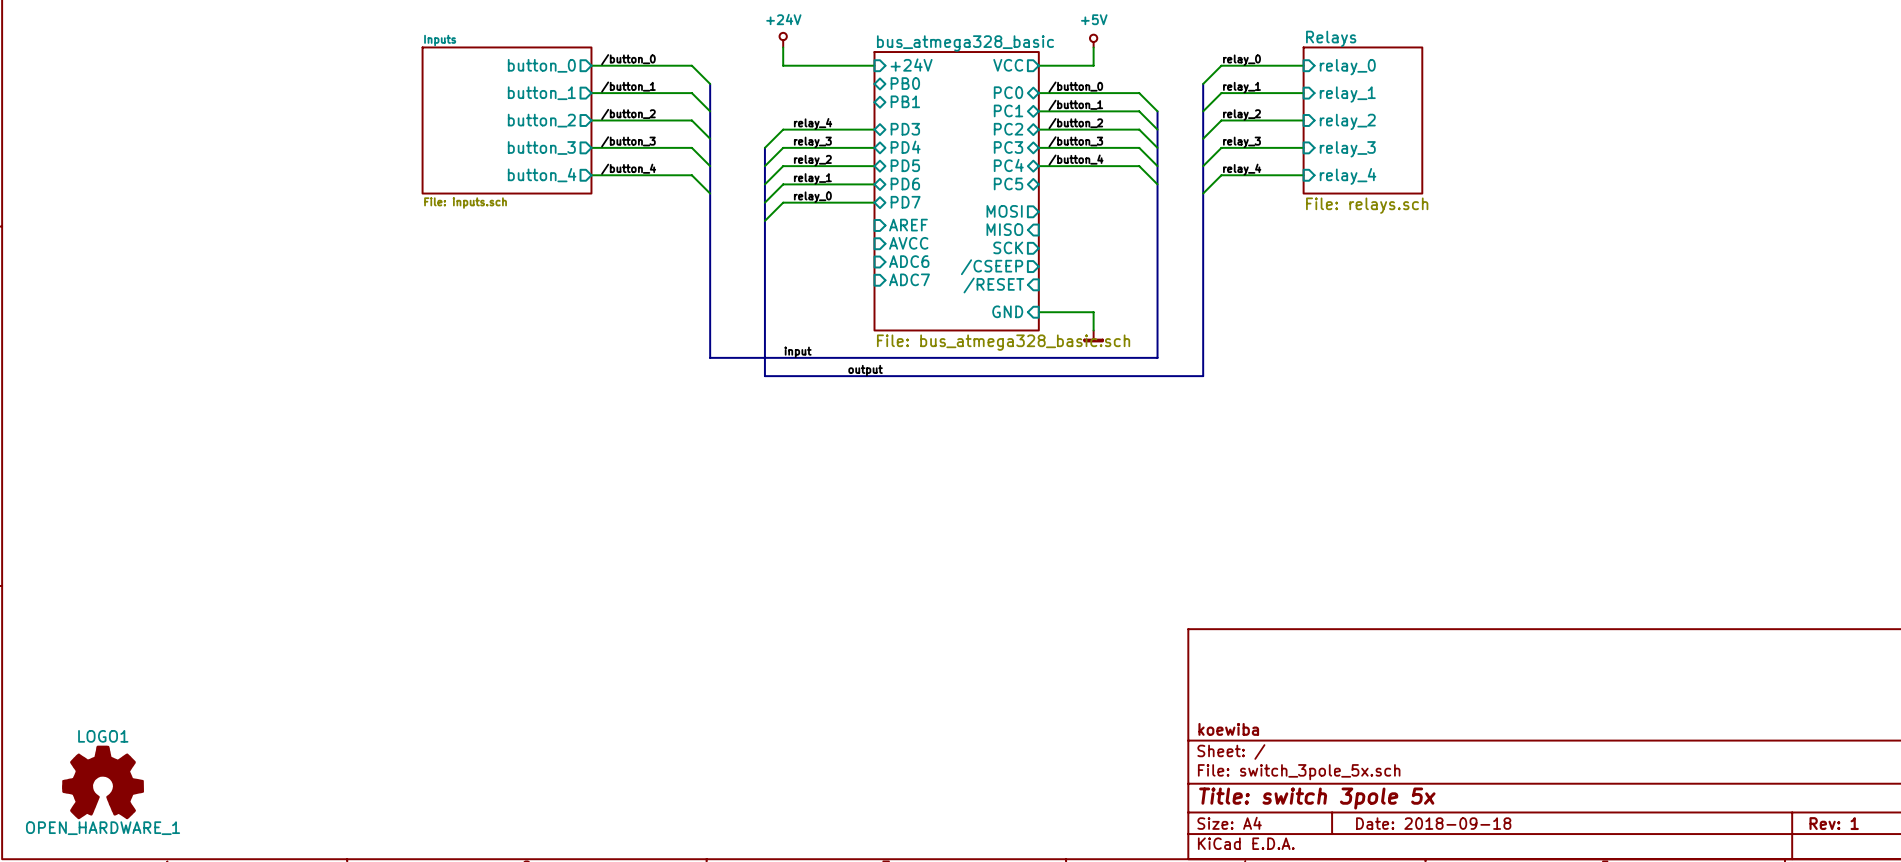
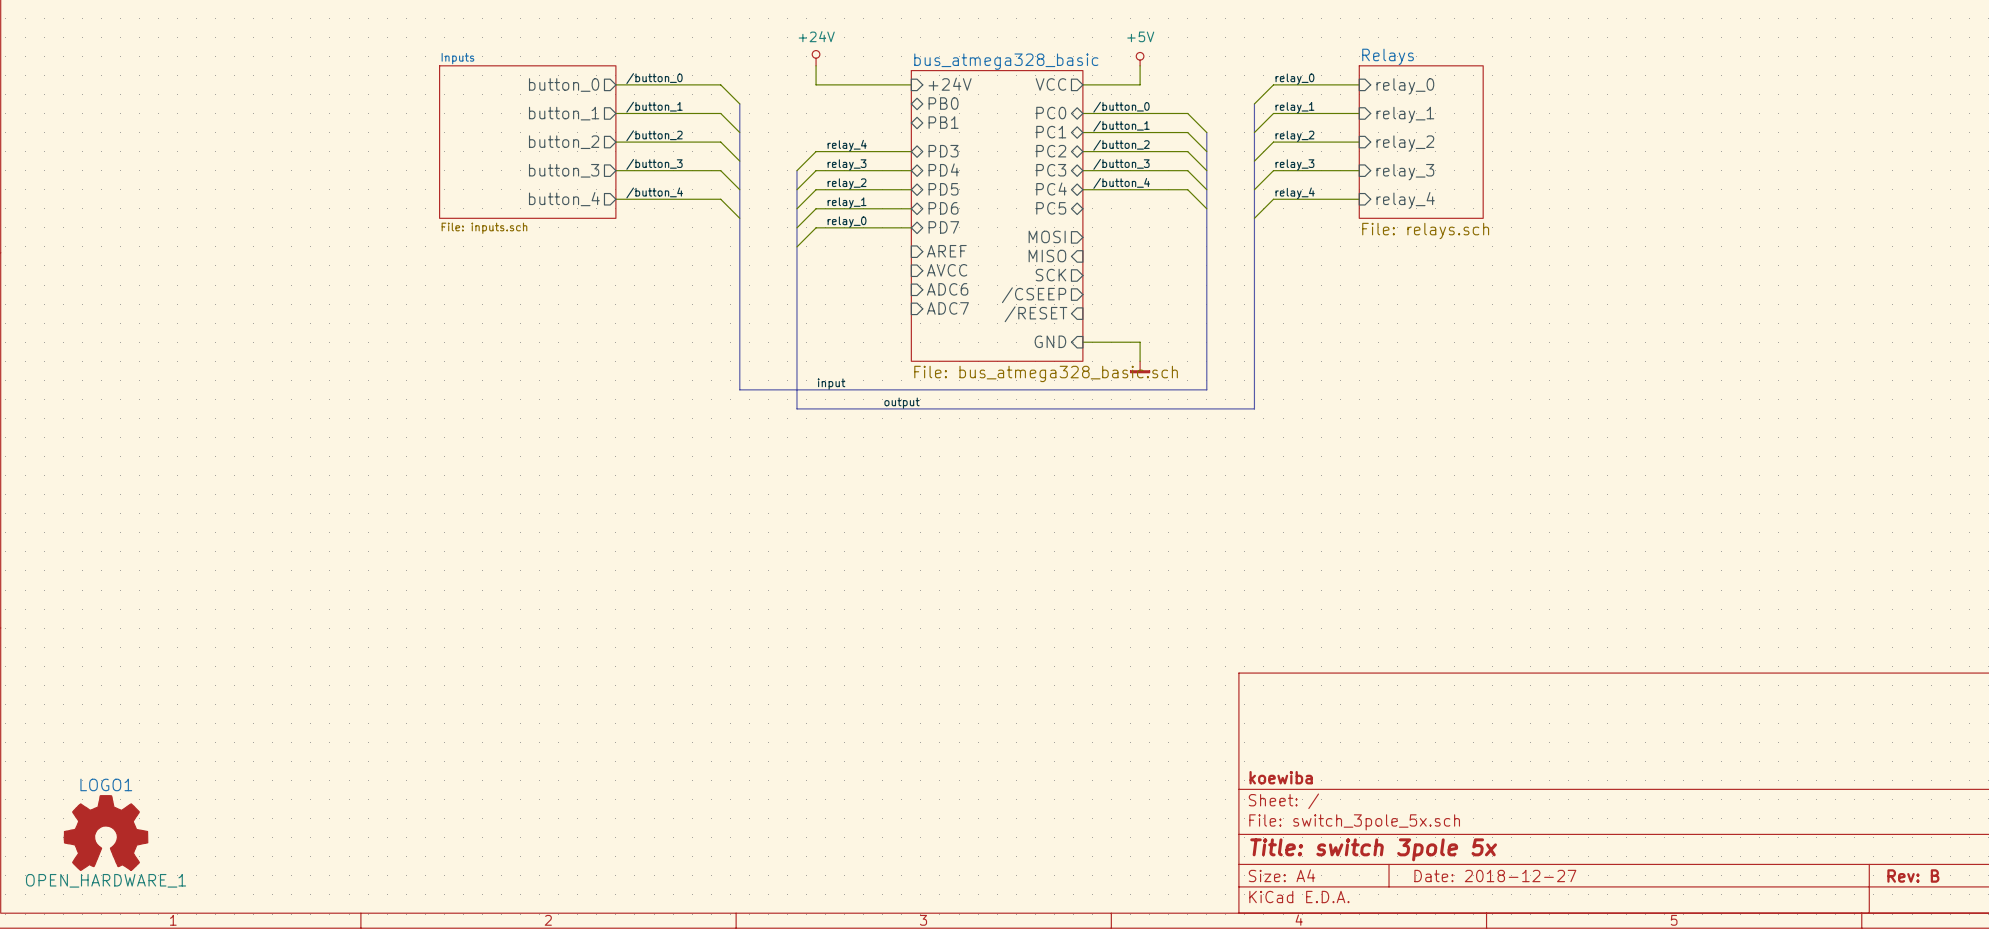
title block: Date: 2018-09-18 (1433, 823) -> Date: 2018-12-27 (1495, 876)
title block: Rev: 1 (1834, 823) -> Rev: B (1913, 876)

